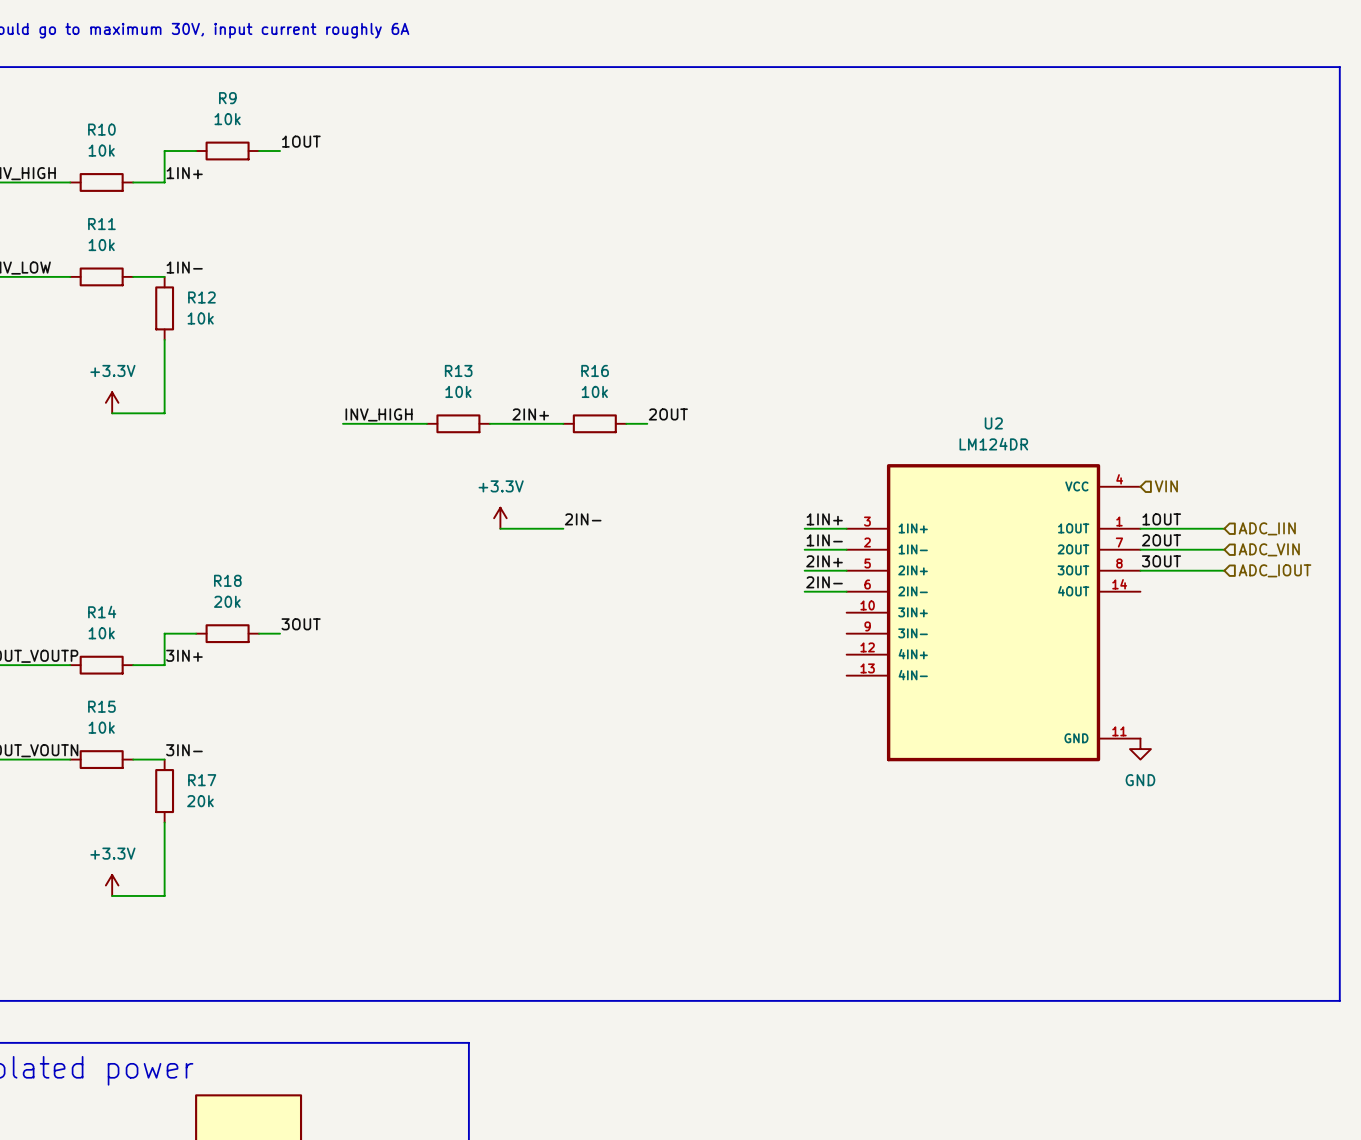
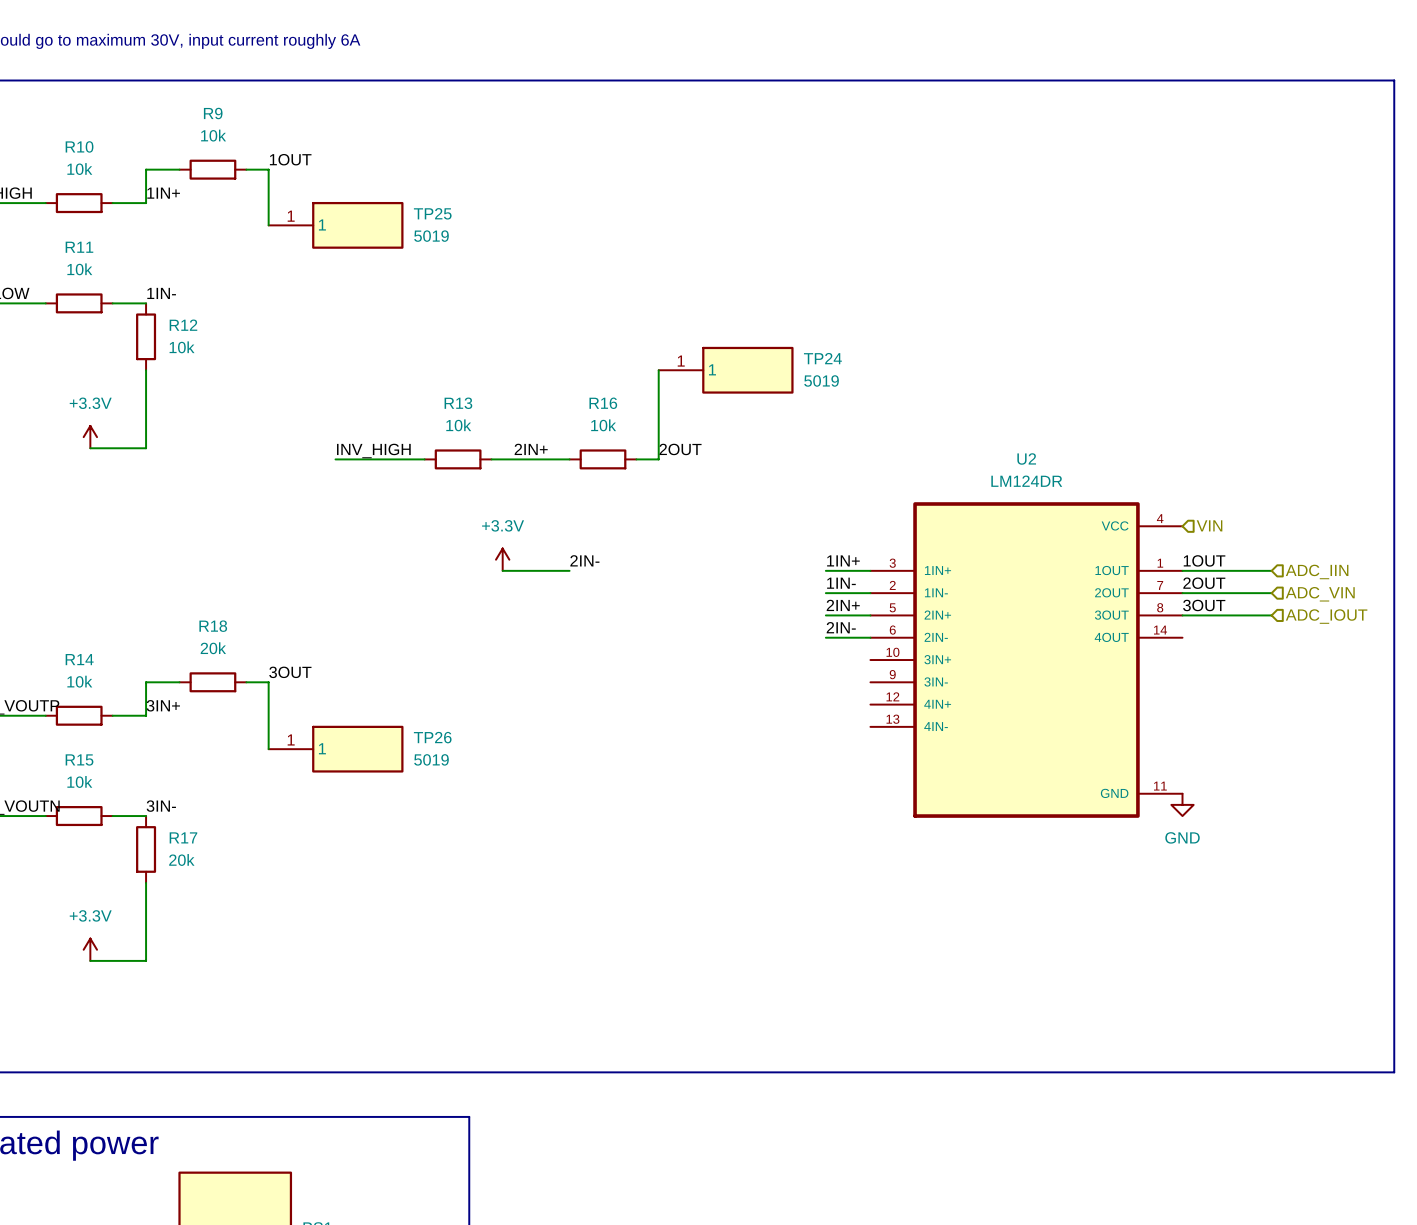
wire: none -> (268, 169) (268, 225)
TP25: none -> 5019 (336, 225)
wire: none -> (658, 370) (658, 459)
TP24: none -> 5019 (726, 370)
wire: none -> (268, 682) (268, 749)
TP26: none -> 5019 (336, 749)

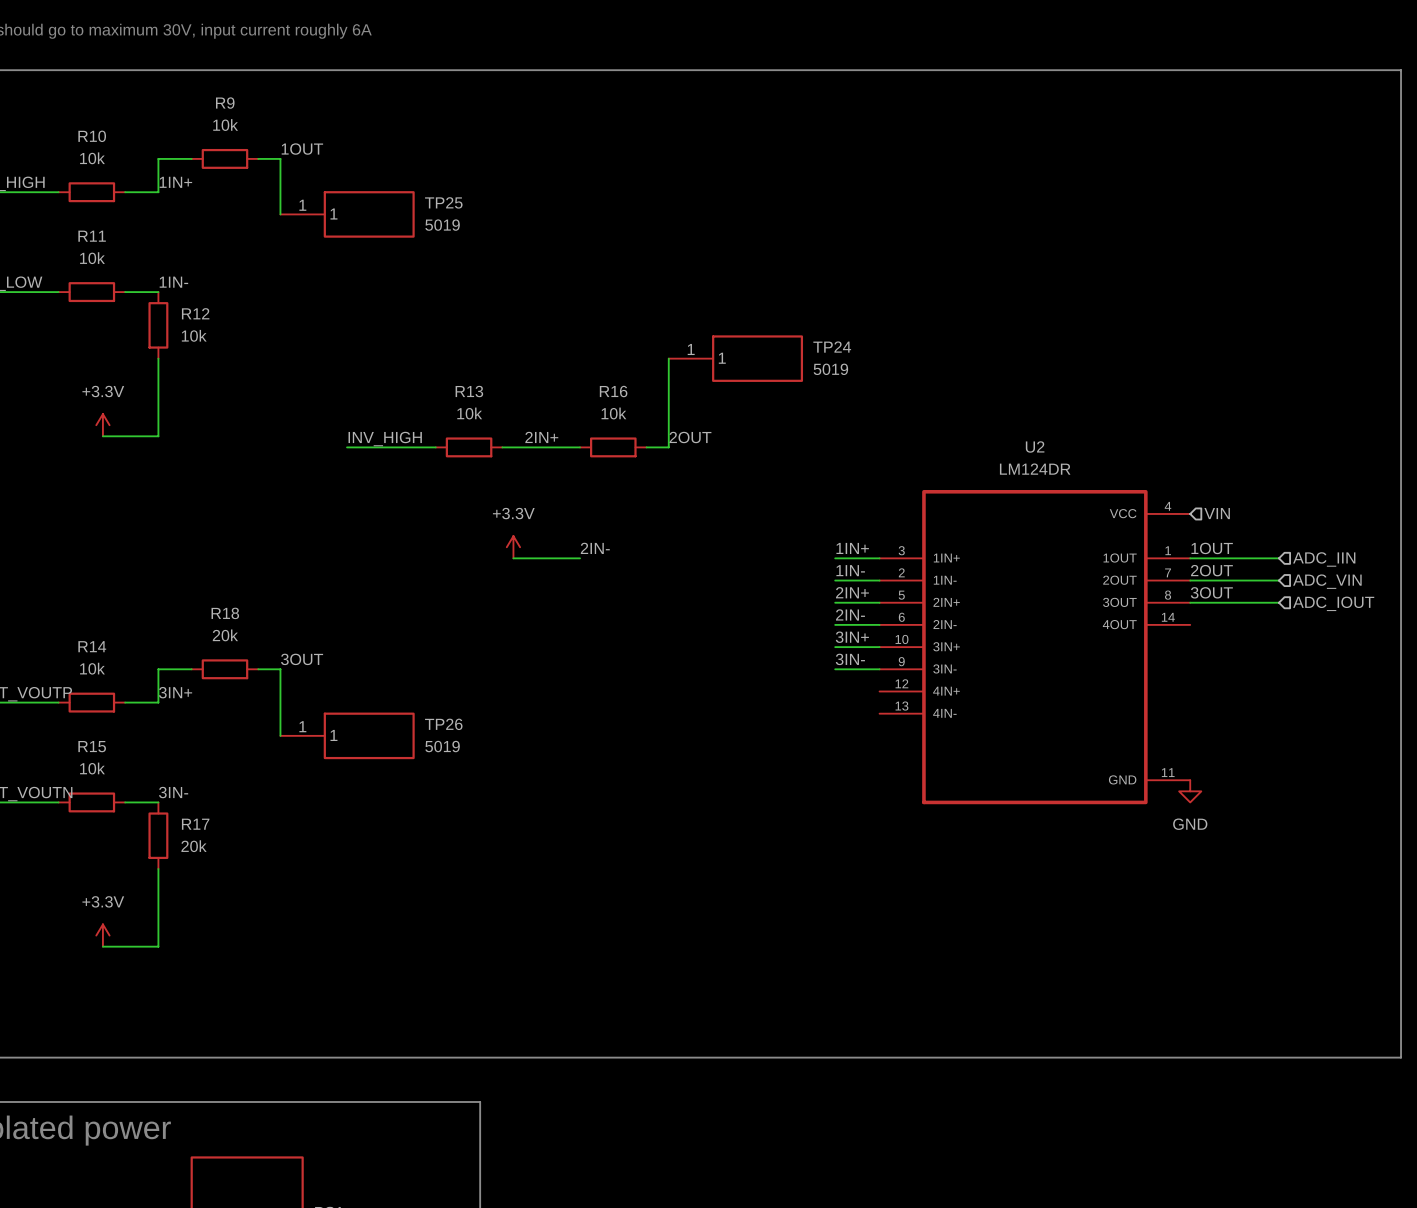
label: none -> 3IN+ (852, 637)
wire: none -> (835, 647) (879, 647)
label: none -> 3IN- (850, 659)
wire: none -> (835, 669) (879, 669)

